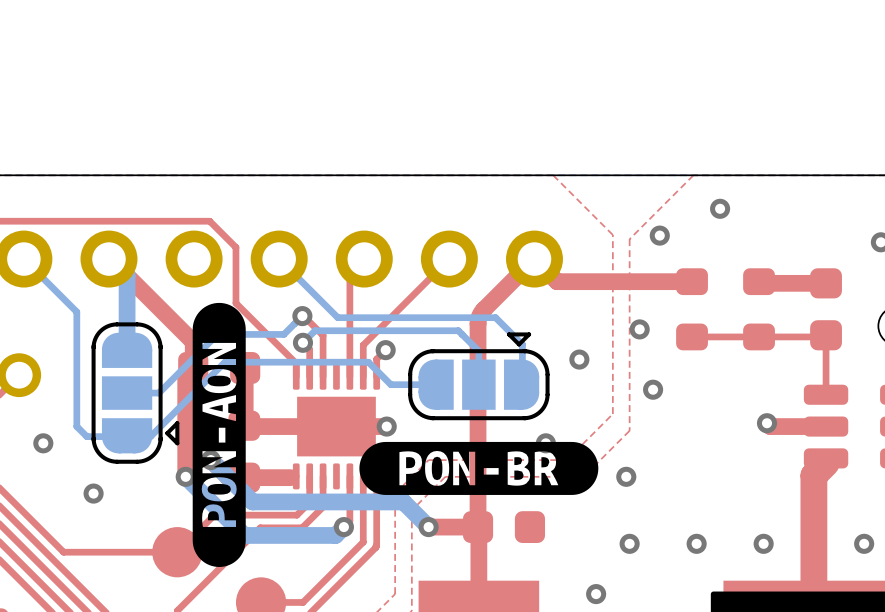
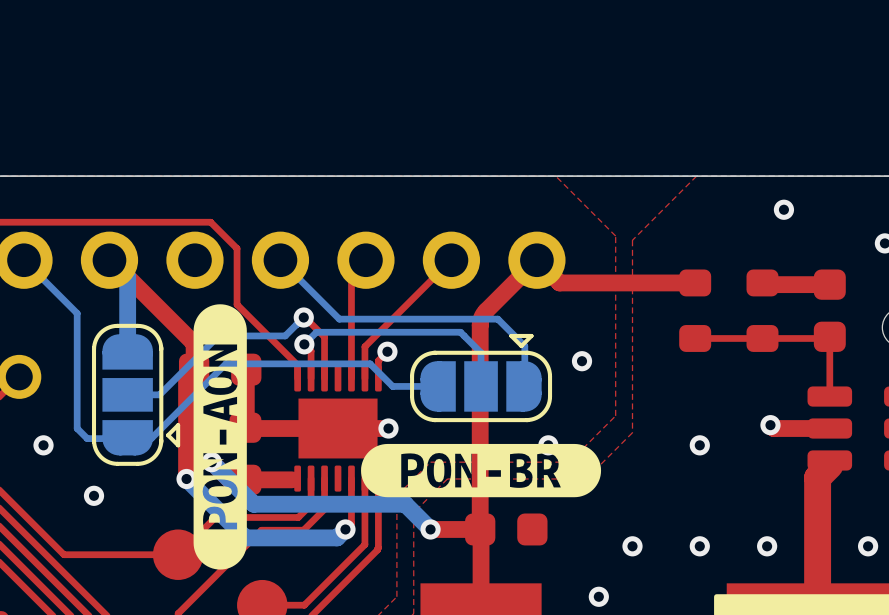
via position: (720, 208) -> (783, 209)
via: (659, 235) -> none
via: (639, 329) -> none
via: (653, 389) -> none
via: none -> (699, 445)
via: (626, 476) -> none

